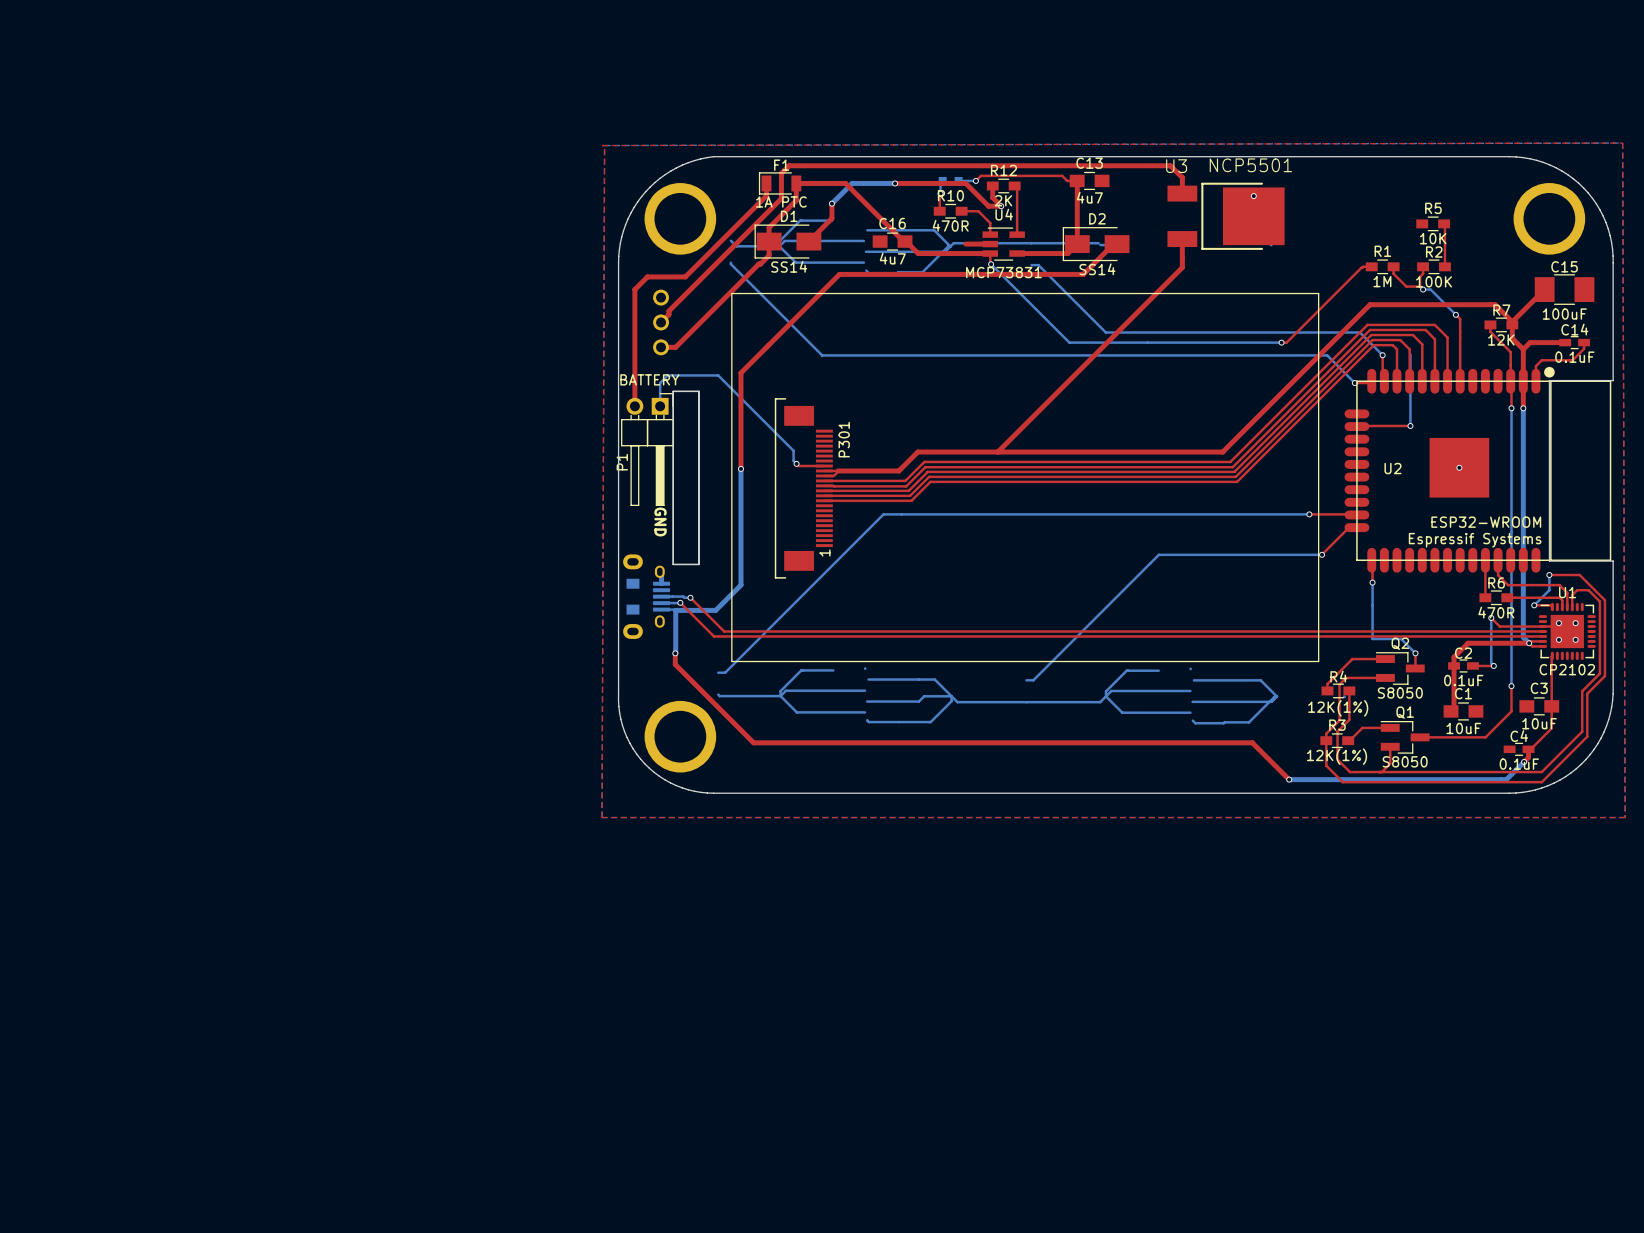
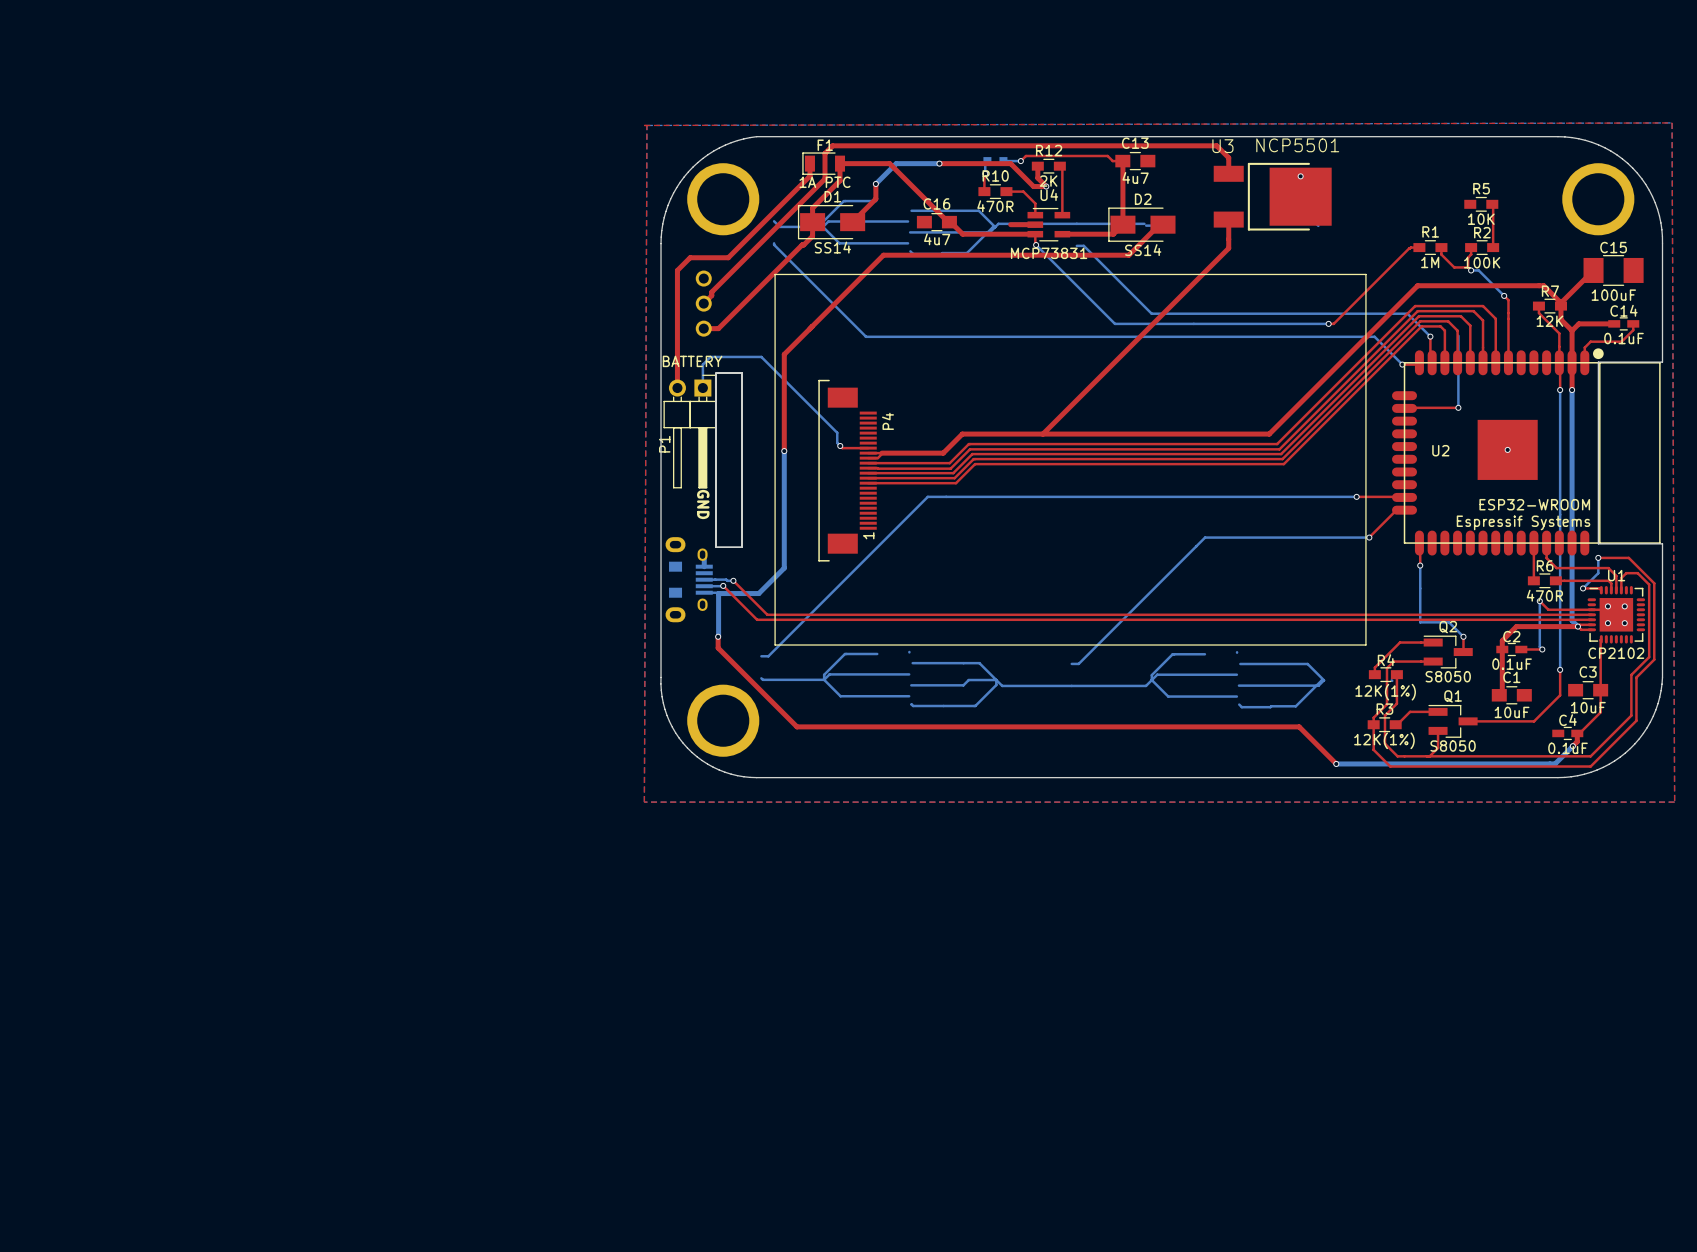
P301 name: P301 (844, 439) -> P4 (887, 421)

